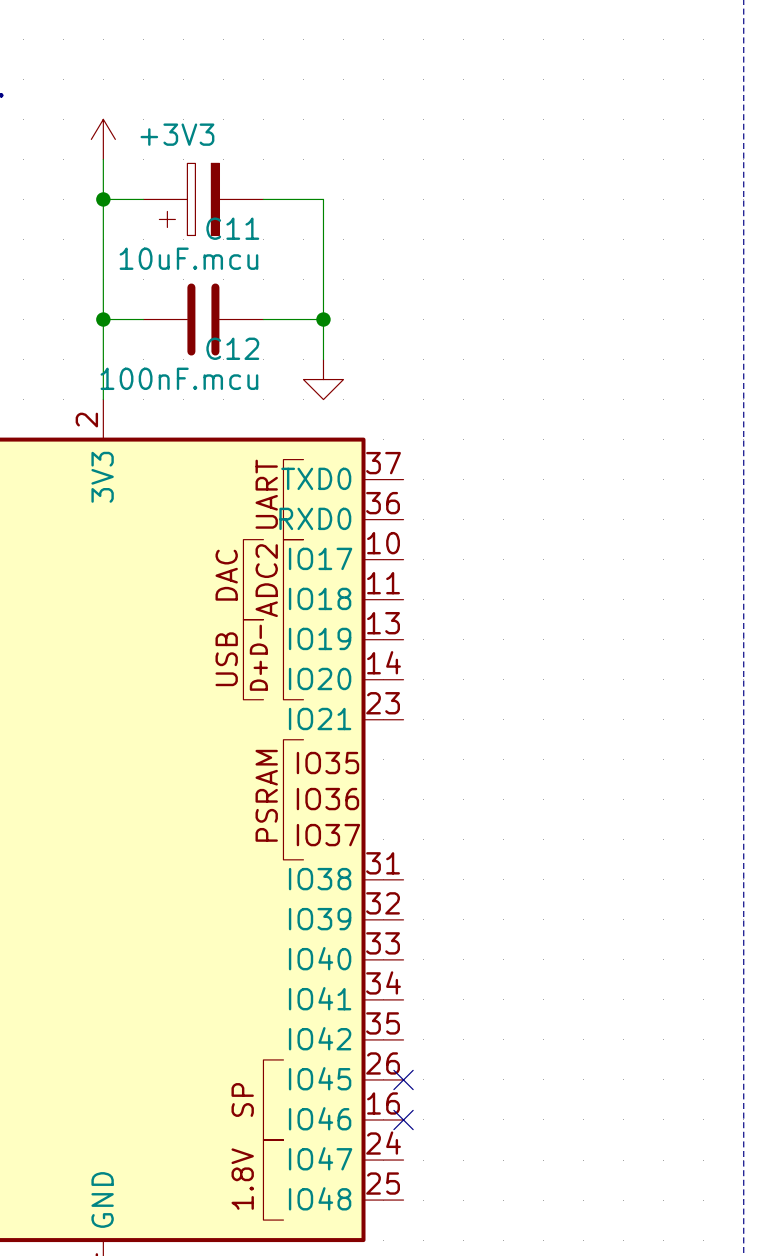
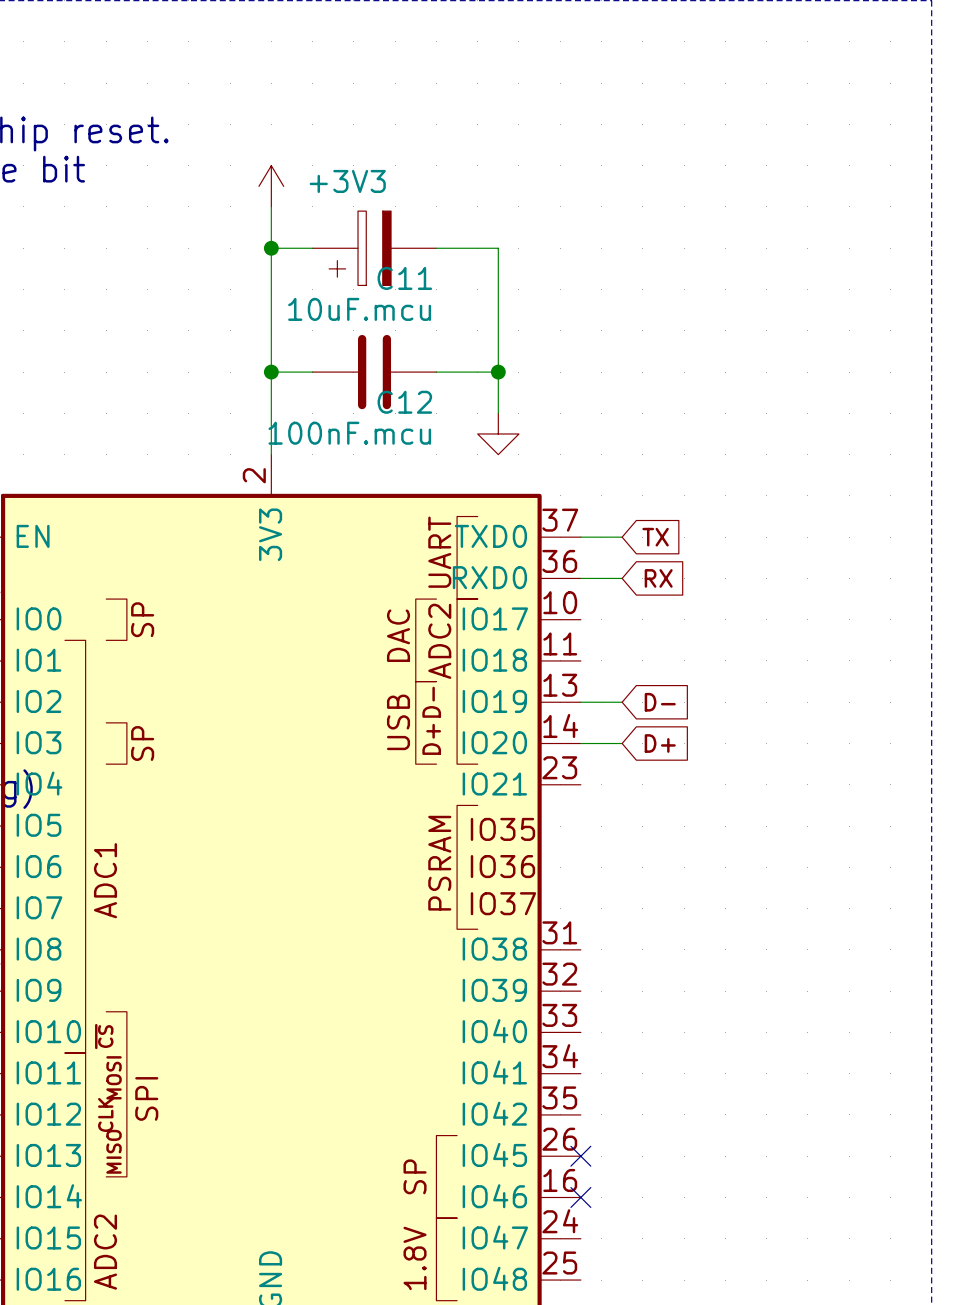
wire: none -> (580, 537) (622, 537)
global label: none -> TX (655, 537)
wire: none -> (580, 578) (622, 578)
global label: none -> RX (658, 578)
wire: none -> (580, 702) (622, 702)
global label: none -> D- (660, 702)
wire: none -> (580, 743) (622, 743)
global label: none -> D+ (660, 743)

